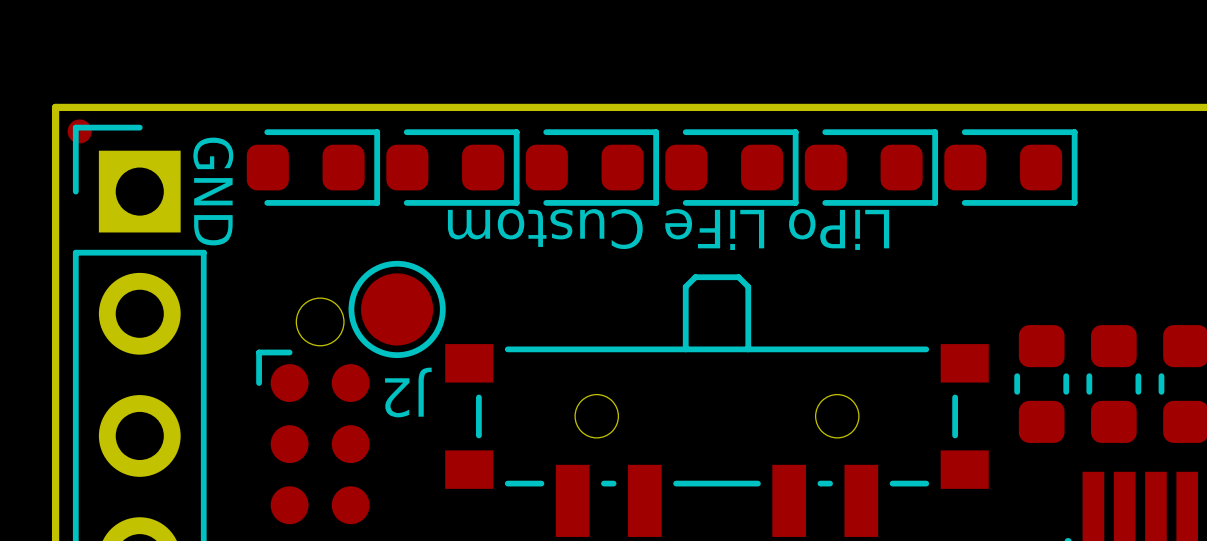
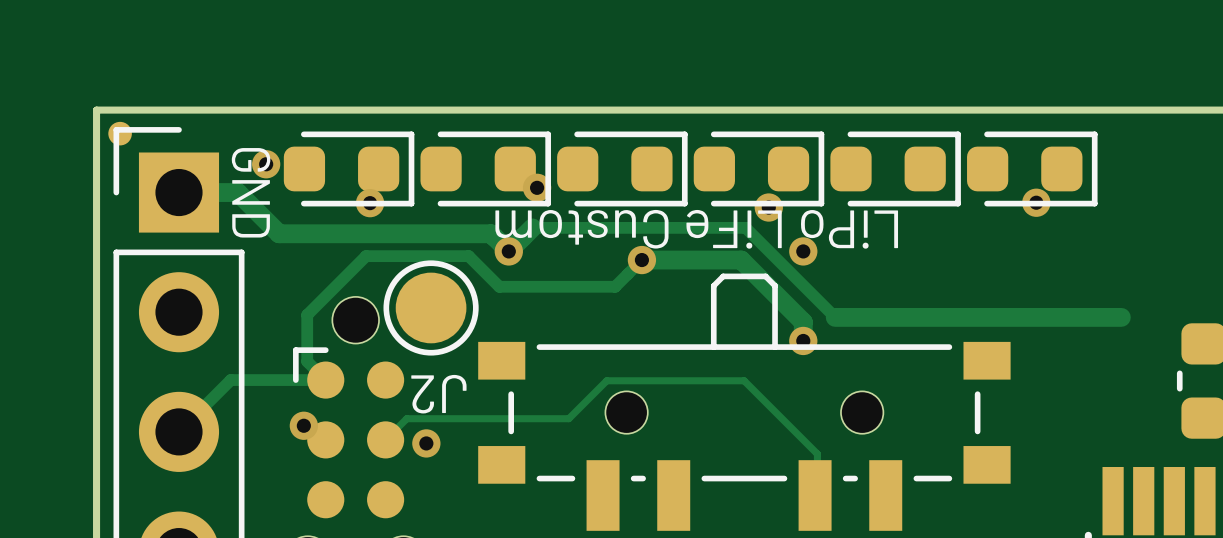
via: none -> (266, 164)
via: none -> (537, 187)
track: none -> (178, 192) (237, 192) (279, 233) (491, 233) (508, 251) (532, 227) (745, 227) (835, 317) (1121, 317)
via: none -> (370, 203)
via: none -> (1036, 202)
via: none -> (768, 207)
via: none -> (508, 251)
via: none -> (803, 251)
via: none -> (641, 260)
track: none -> (803, 340) (803, 322) (741, 260) (641, 260) (615, 286) (499, 286) (468, 256) (366, 256) (307, 314) (307, 361) (325, 380) (230, 380) (178, 431)
via: none -> (803, 340)
part: (1041, 384) -> none
part: (1113, 384) -> none
via: none -> (303, 425)
track: none -> (385, 439) (406, 418) (568, 418) (606, 380) (744, 380) (817, 454) (817, 469)
via: none -> (426, 443)

